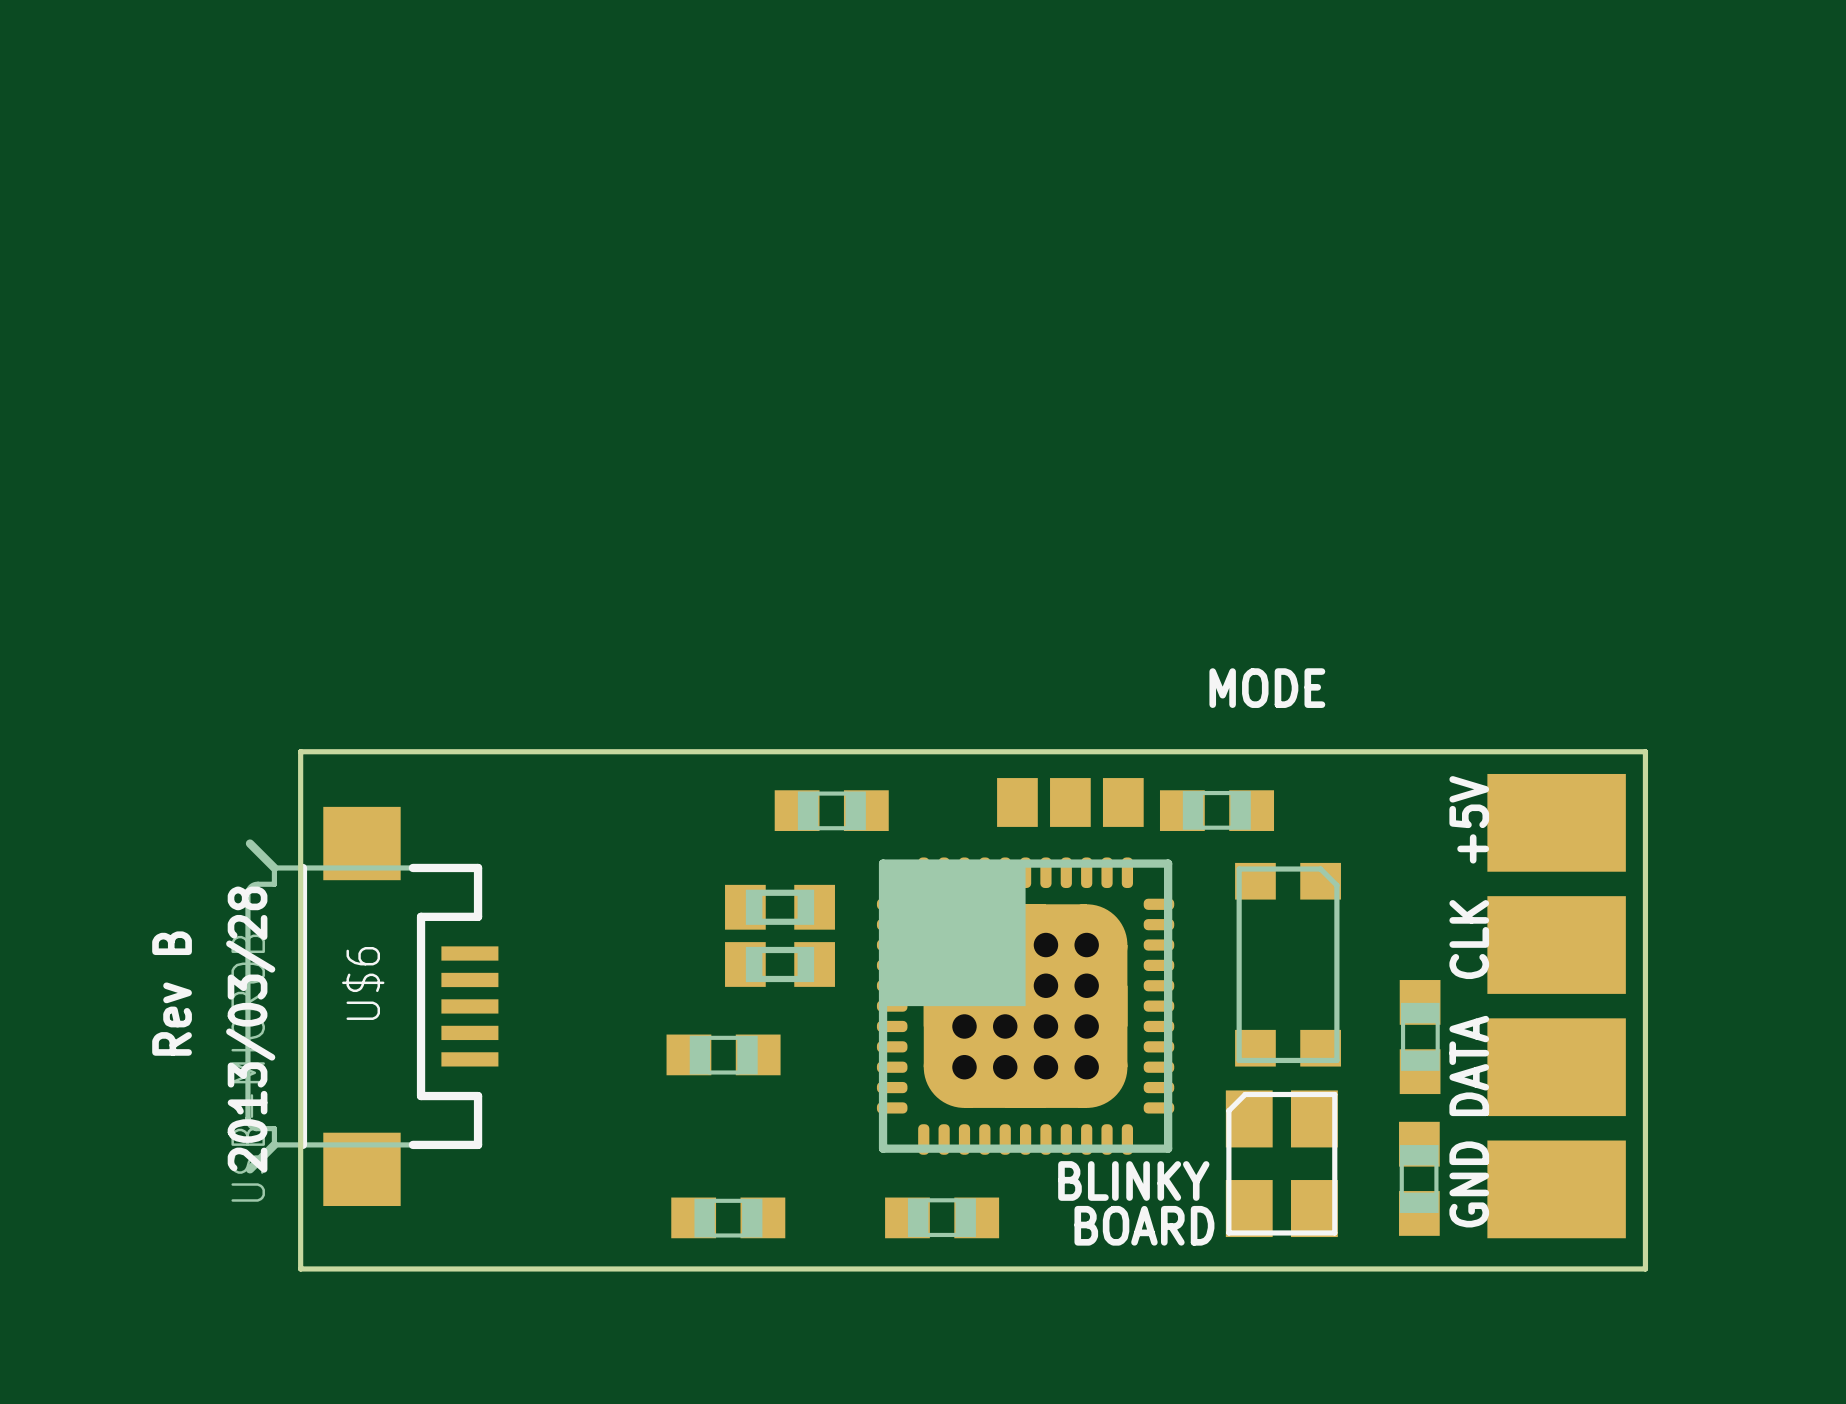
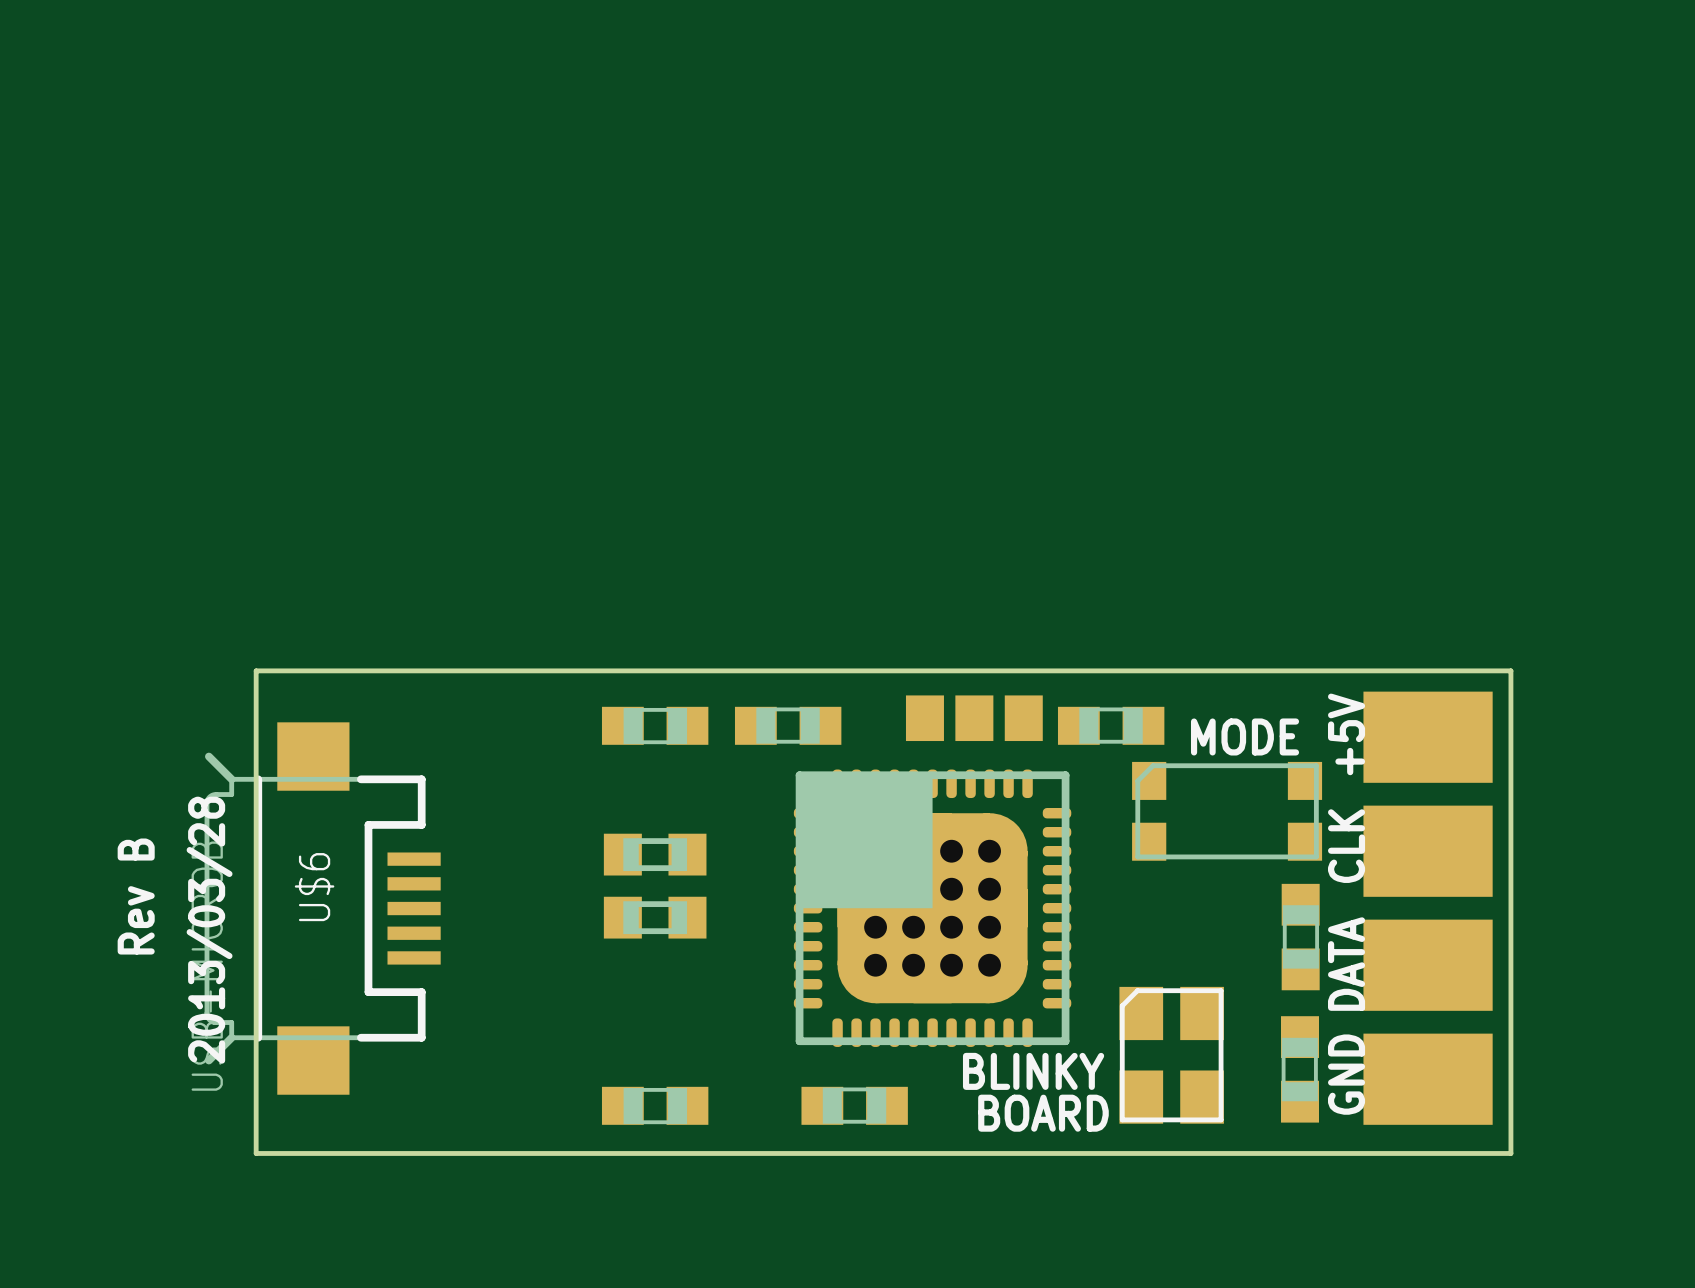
text position: MODE (1267, 688) -> MODE (1245, 736)
part position: (831, 810) -> (788, 725)
part: (780, 907) -> none
part: none -> (655, 854)
part: (780, 964) -> none
part rotation: 0° (1288, 964) -> 90° counterclockwise (1227, 811)
part: none -> (655, 917)
part position: (723, 1054) -> (655, 725)

